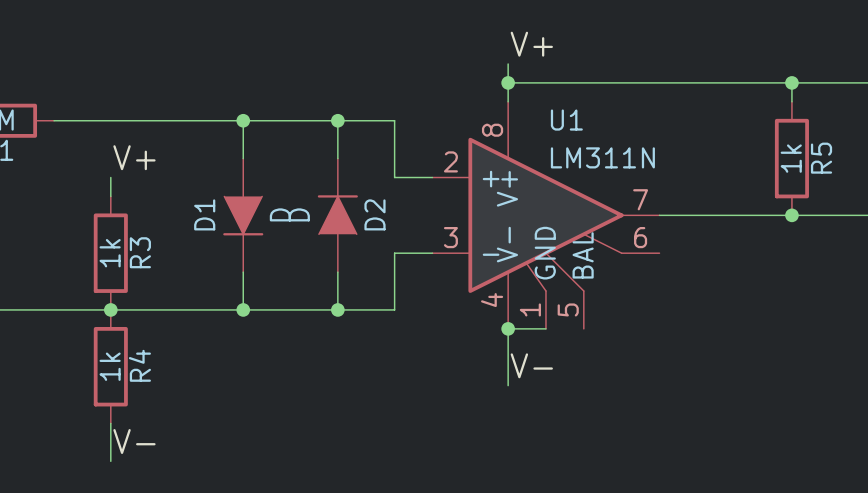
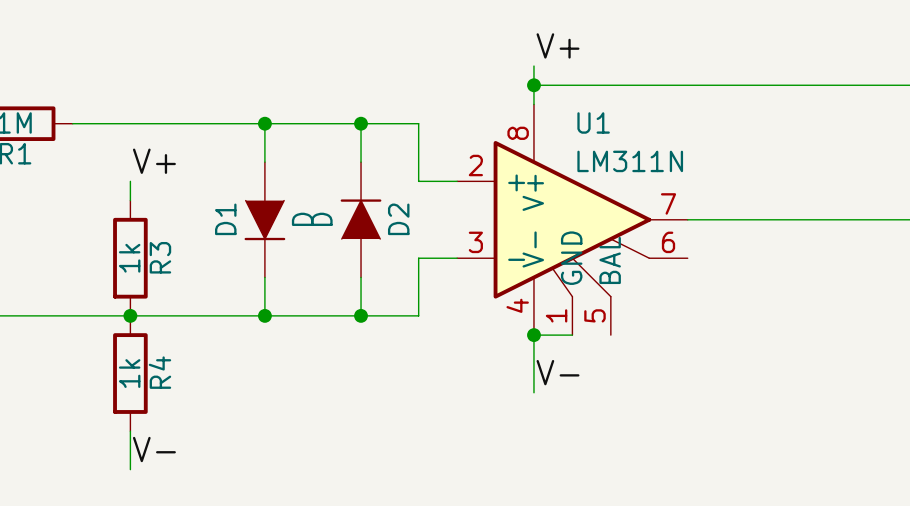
wire: (791, 82) (791, 101) -> none
junction: (791, 82) -> none
R5: 1k (791, 158) -> none
junction: (791, 215) -> none

